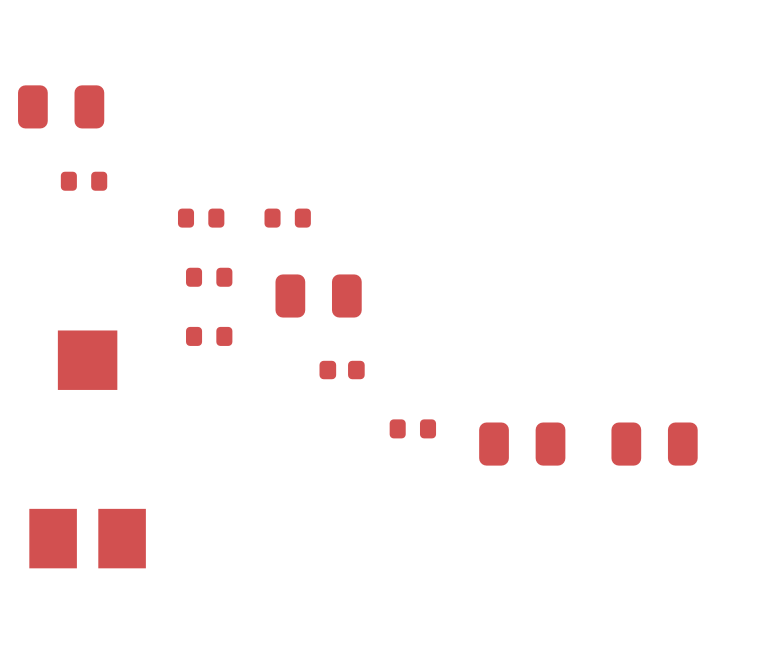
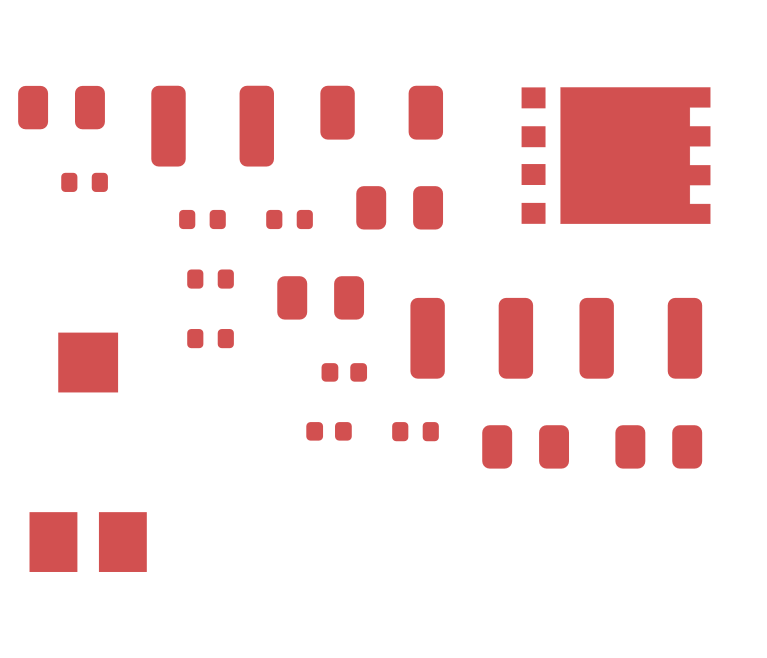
part: none -> (381, 112)
part: none -> (212, 126)
part: none -> (615, 155)
part: none -> (399, 207)
part: none -> (471, 338)
part: none -> (640, 338)
part: none -> (329, 431)

